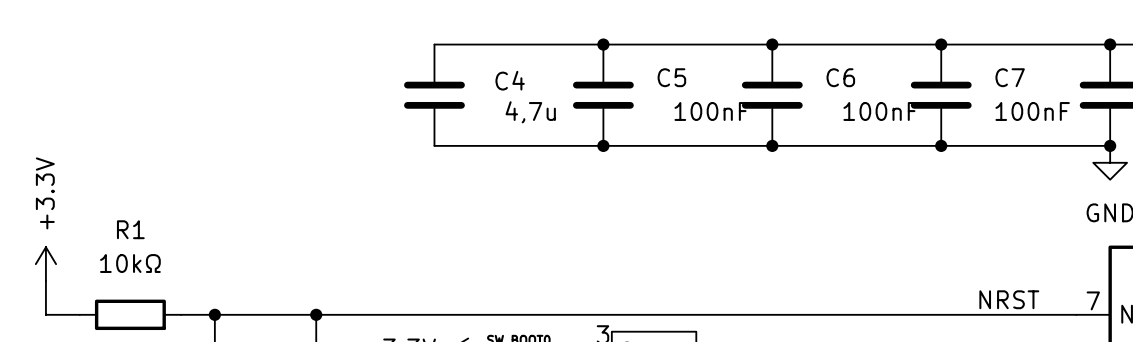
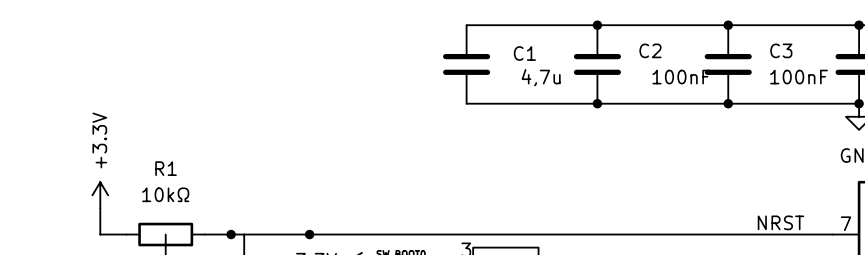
wire: (434, 44) (603, 44) -> none
junction: (603, 44) -> none
C5 name: C5 (671, 77) -> C1 (524, 53)
C6 name: C6 (840, 77) -> C2 (650, 50)
C7 name: C7 (1010, 77) -> C3 (781, 50)
C4: 4,7u (434, 95) -> none
C5 value: 100nF (711, 111) -> 4,7u (541, 77)
wire: (434, 145) (603, 145) -> none
junction: (603, 145) -> none
power symbol position: +3.3V (45, 264) -> +3.3V (100, 195)
wire: (45, 281) (45, 314) (79, 314) -> (100, 208) (100, 234) (126, 234)
R1 position: (130, 314) -> (165, 234)
wire: (181, 314) (265, 314) -> none
junction: (214, 314) -> none
junction position: (316, 314) -> (231, 234)
junction: none -> (309, 234)

